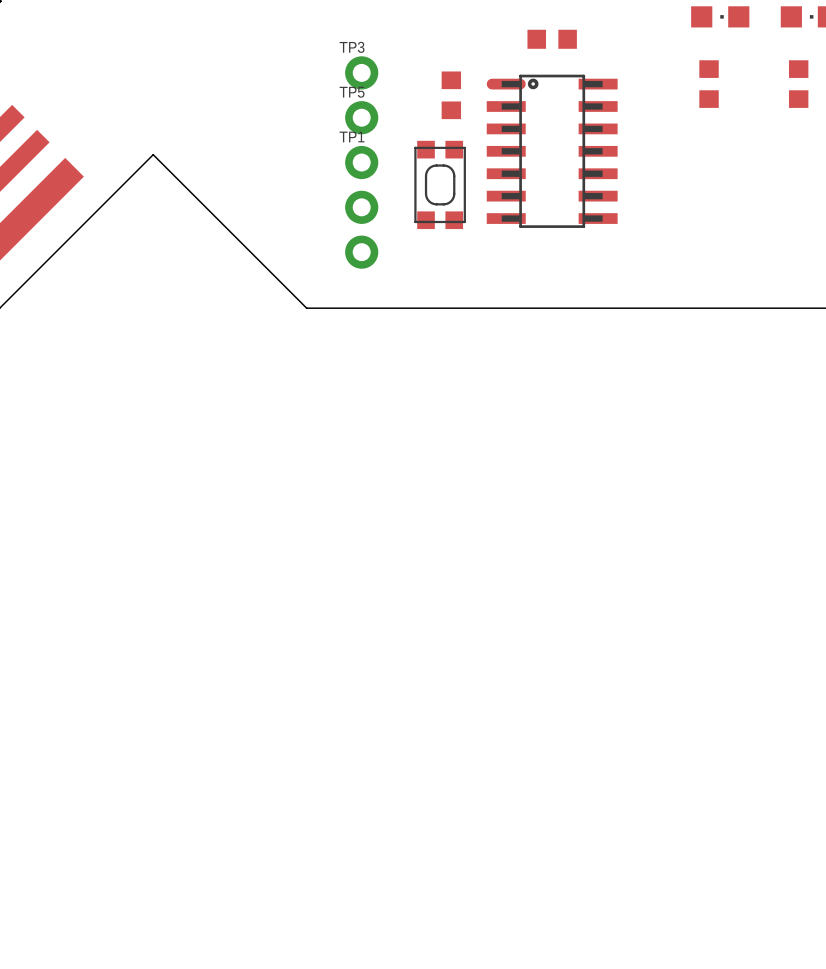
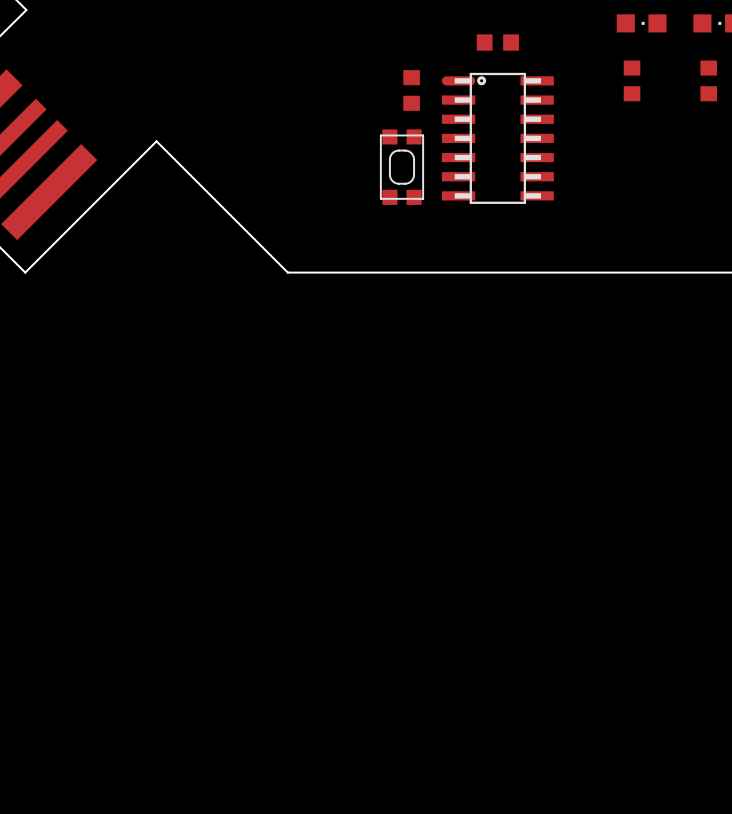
TP3: (361, 72) -> none
TP5: (361, 117) -> none
TP1: (361, 162) -> none
part: (361, 207) -> none
part: (361, 252) -> none

